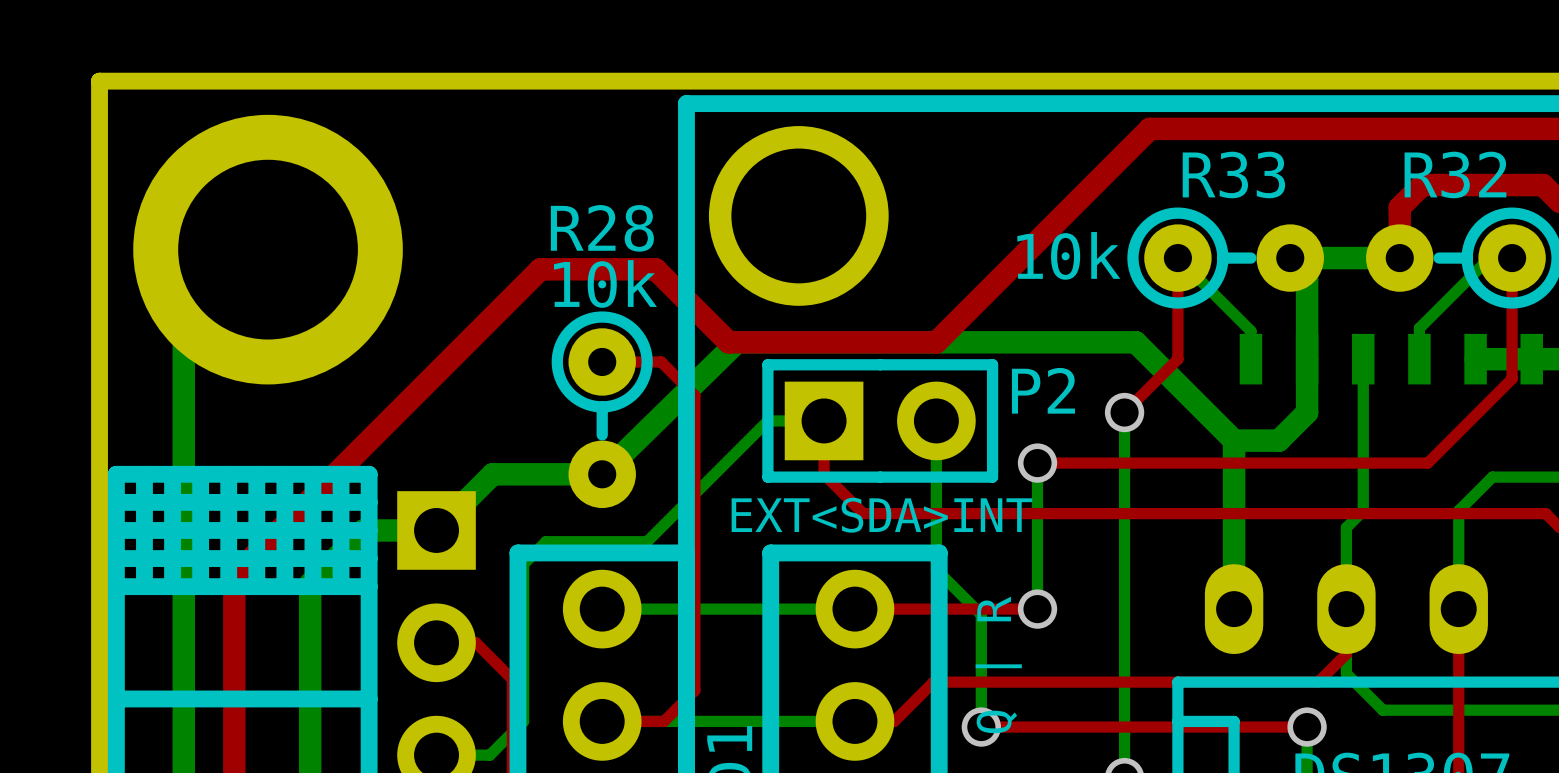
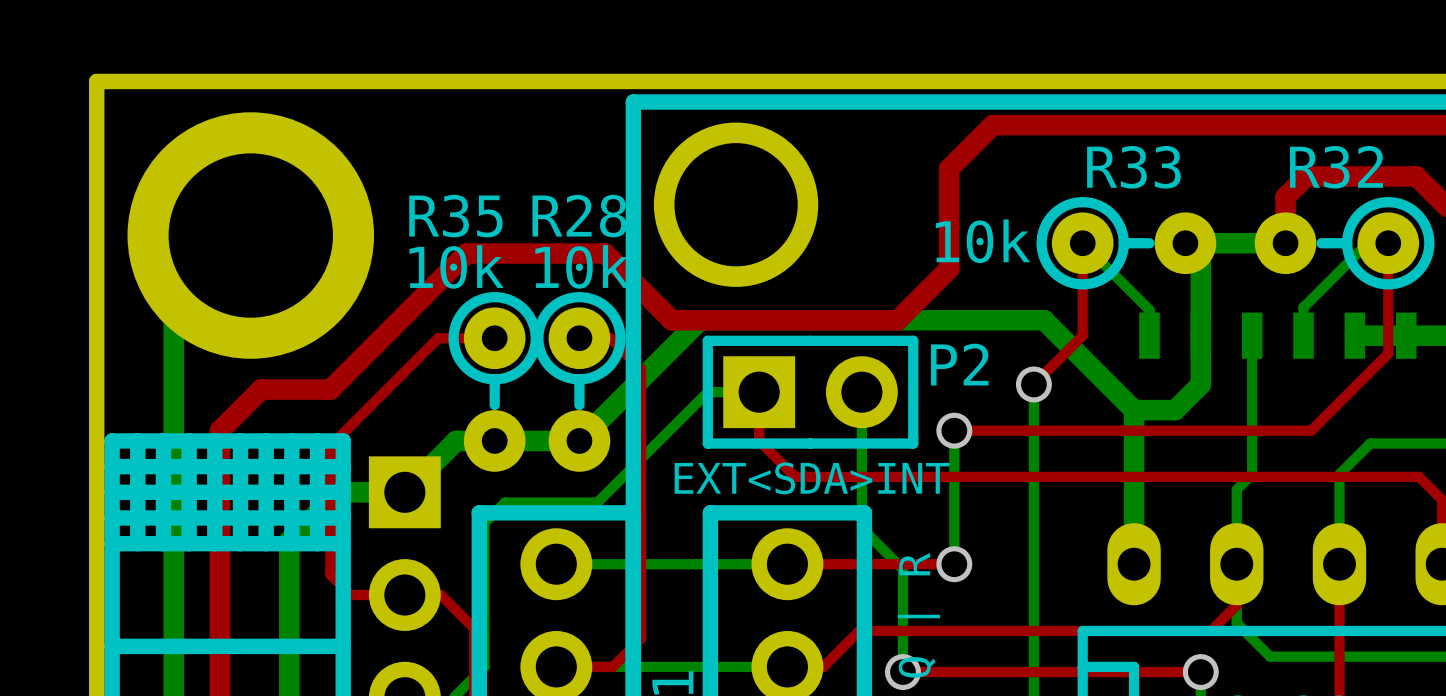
top track: (1149, 128) (936, 342) -> (1057, 125) (992, 125) (949, 168) (949, 268) (897, 320) (861, 320)
top track: (540, 269) (234, 575) -> (499, 253) (466, 253) (330, 389) (261, 389) (219, 430) (219, 533)
bottom track: (759, 342) (737, 342) (602, 474) -> (700, 320) (579, 440) (556, 440)
top track: none -> (494, 338) (438, 338) (330, 446) (330, 574) (350, 595) (404, 595)
R35: none -> 10k (494, 381)
R28 position: (602, 409) -> (579, 381)

